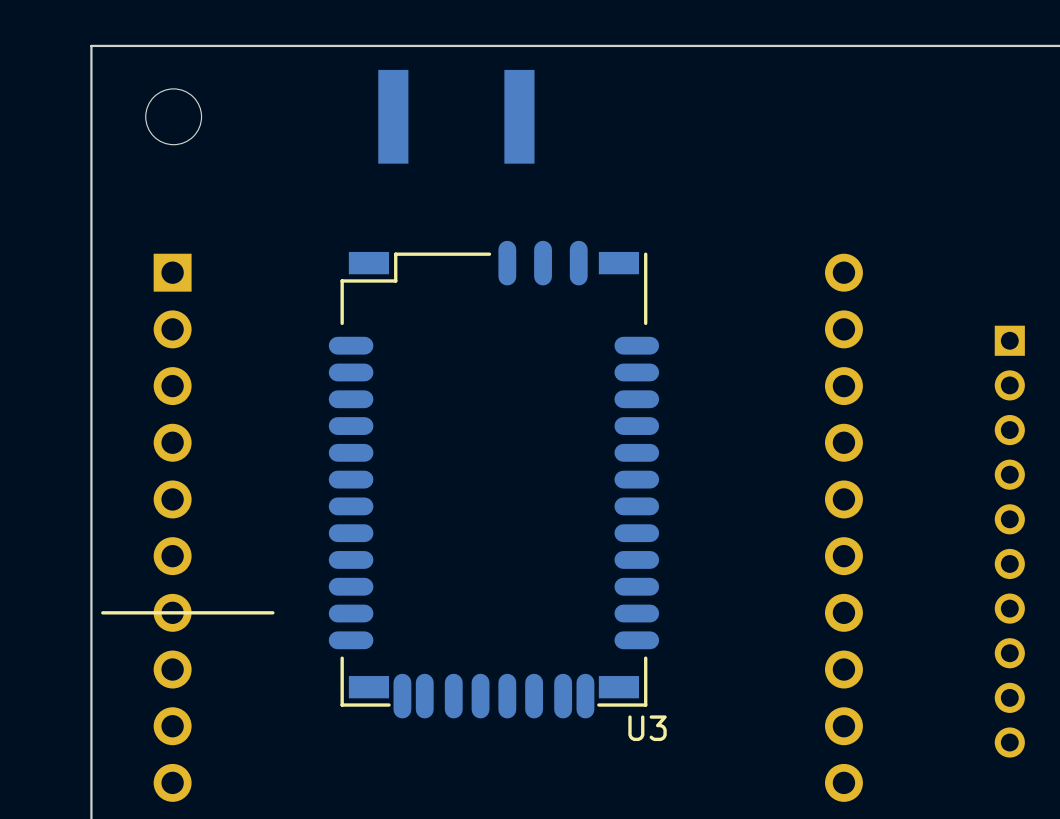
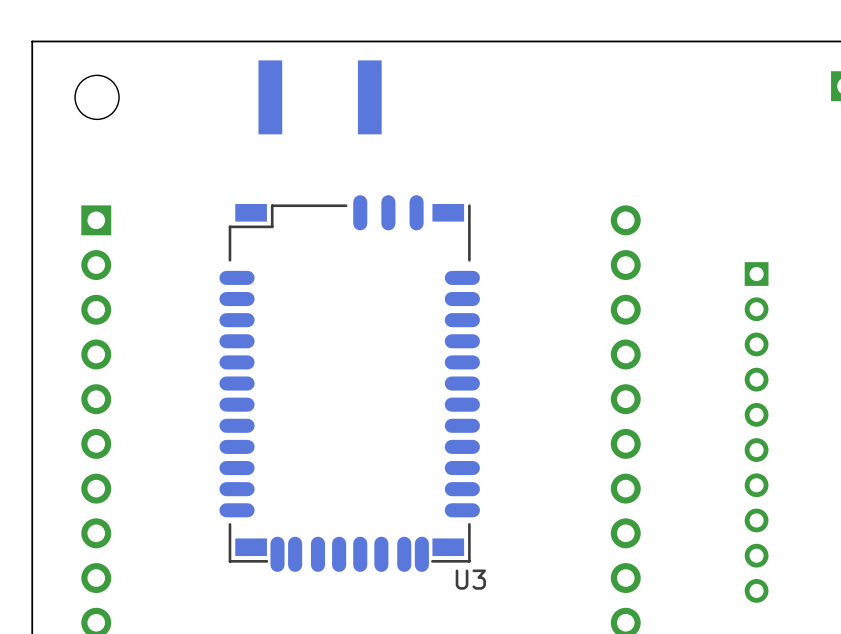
line: (272, 612) (102, 612) -> none

